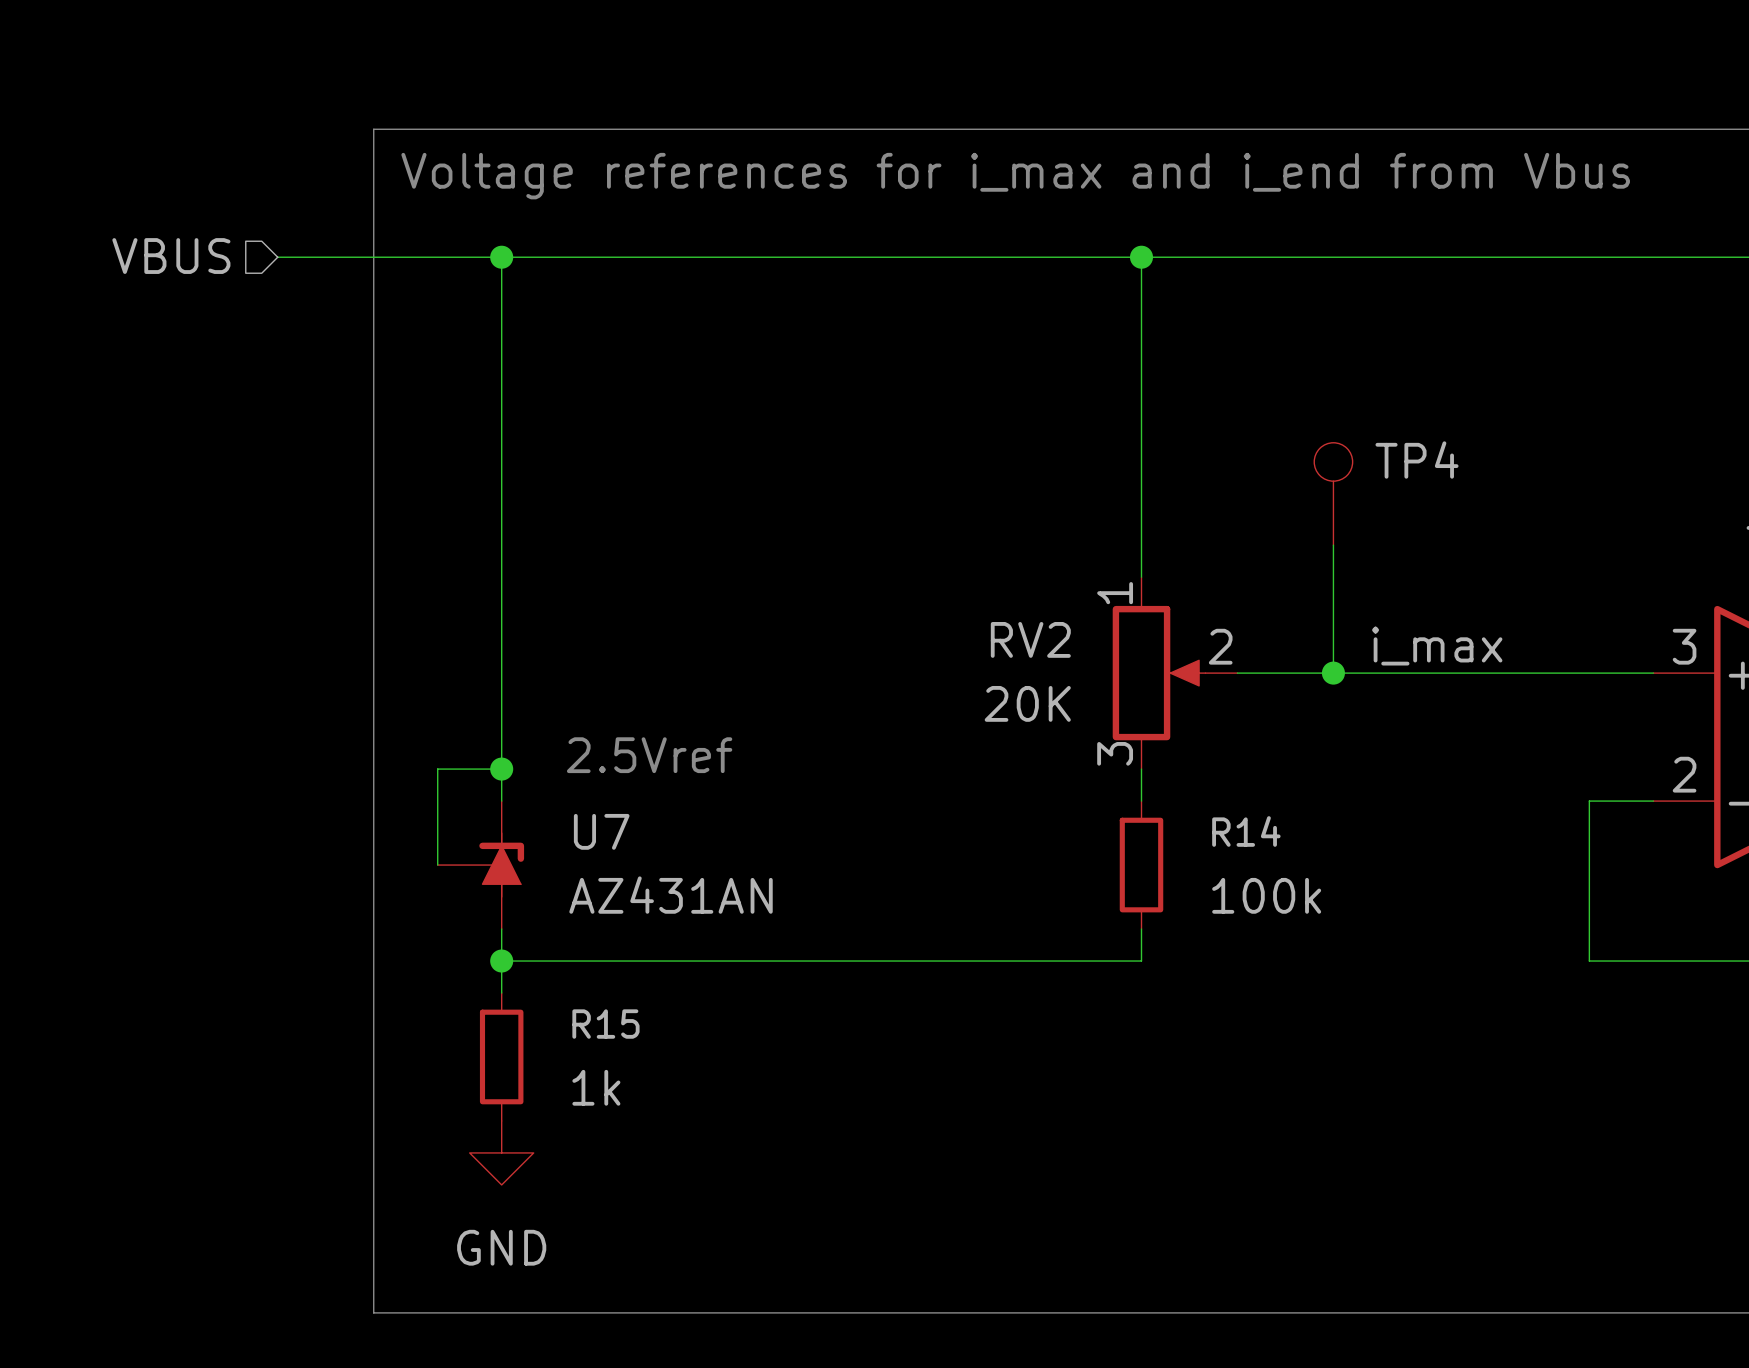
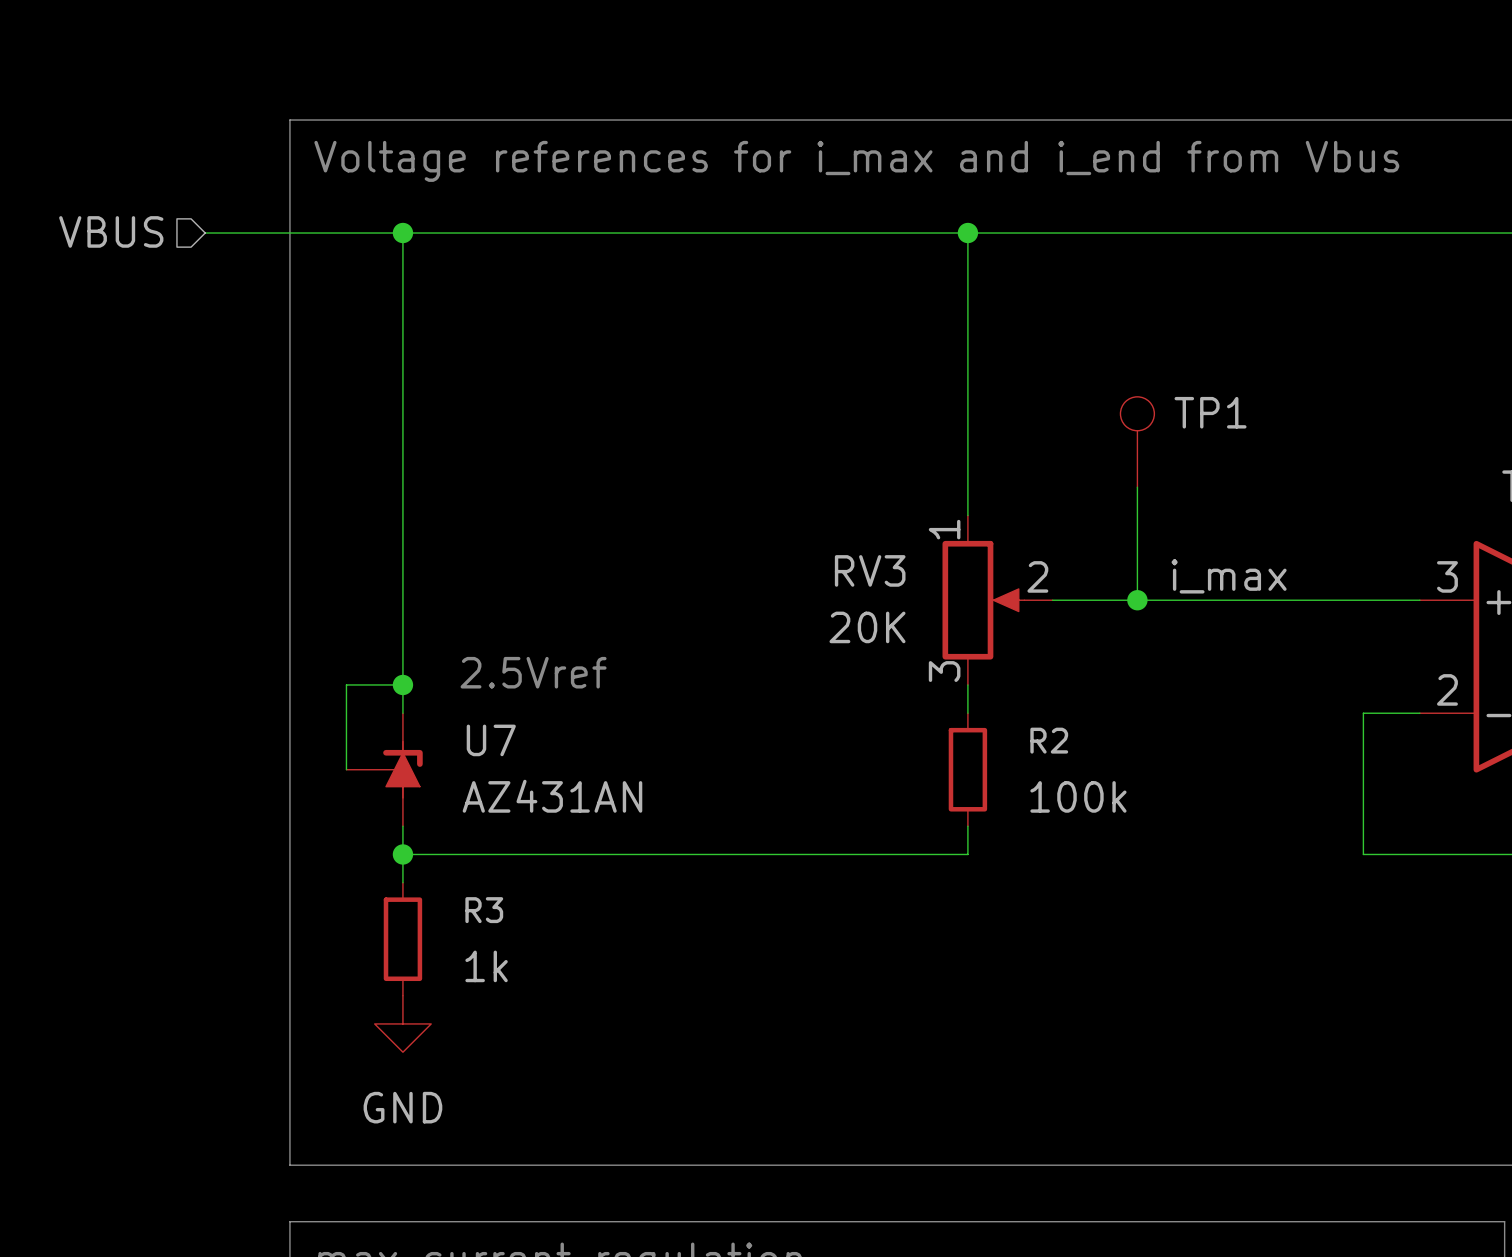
TP4 name: TP4 (1417, 460) -> TP1 (1210, 412)
RV2 name: RV2 (1030, 639) -> RV3 (870, 570)
R14 name: R14 (1246, 831) -> R2 (1049, 740)
R15 name: R15 (605, 1024) -> R3 (484, 910)

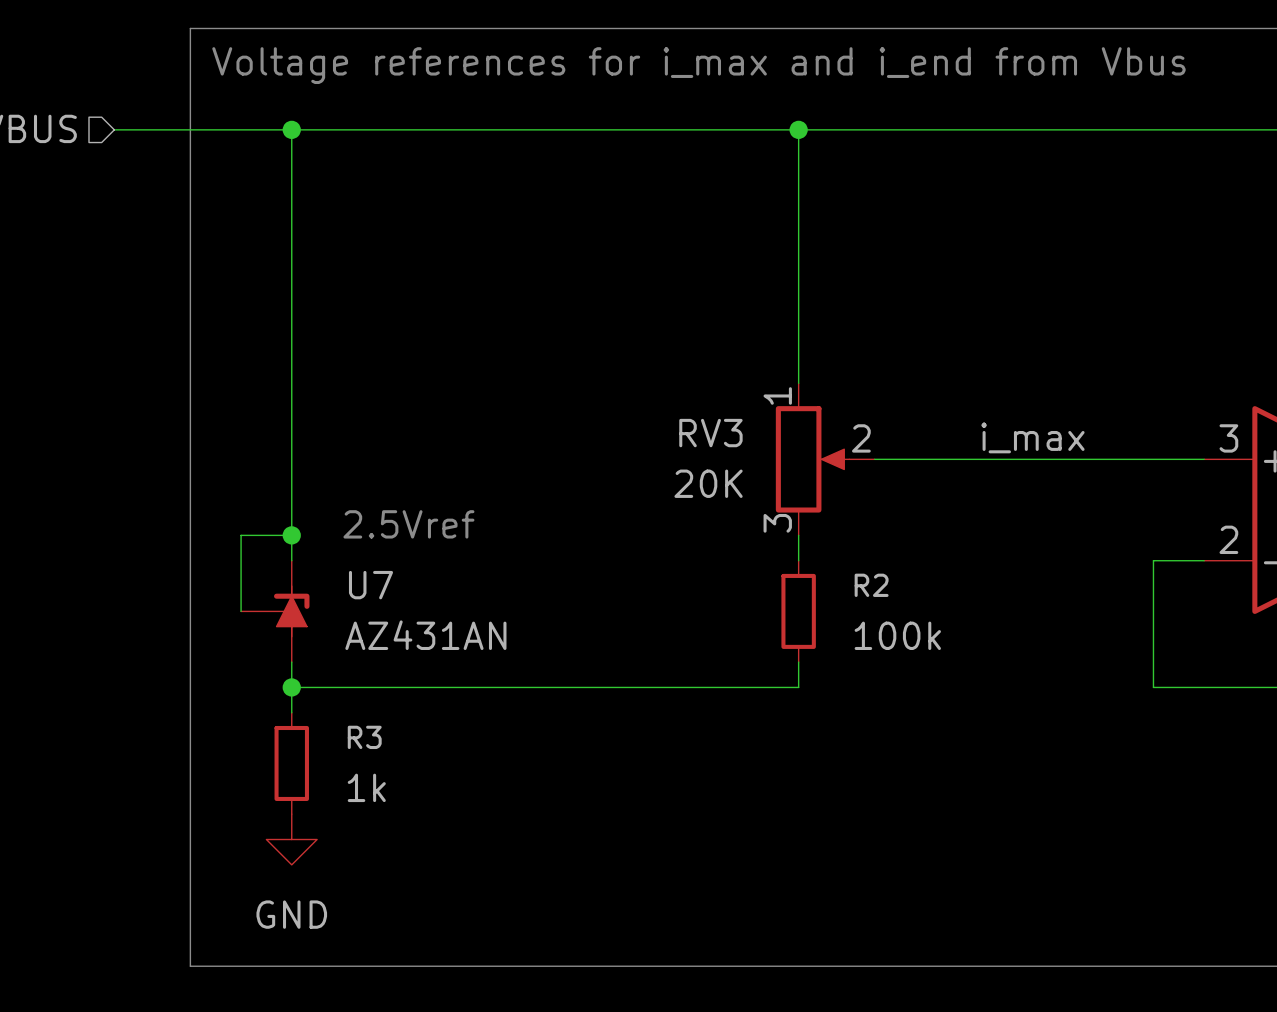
TP1: (1137, 442) -> none
wire: (1137, 487) (1137, 600) -> none
junction: (1137, 600) -> none

